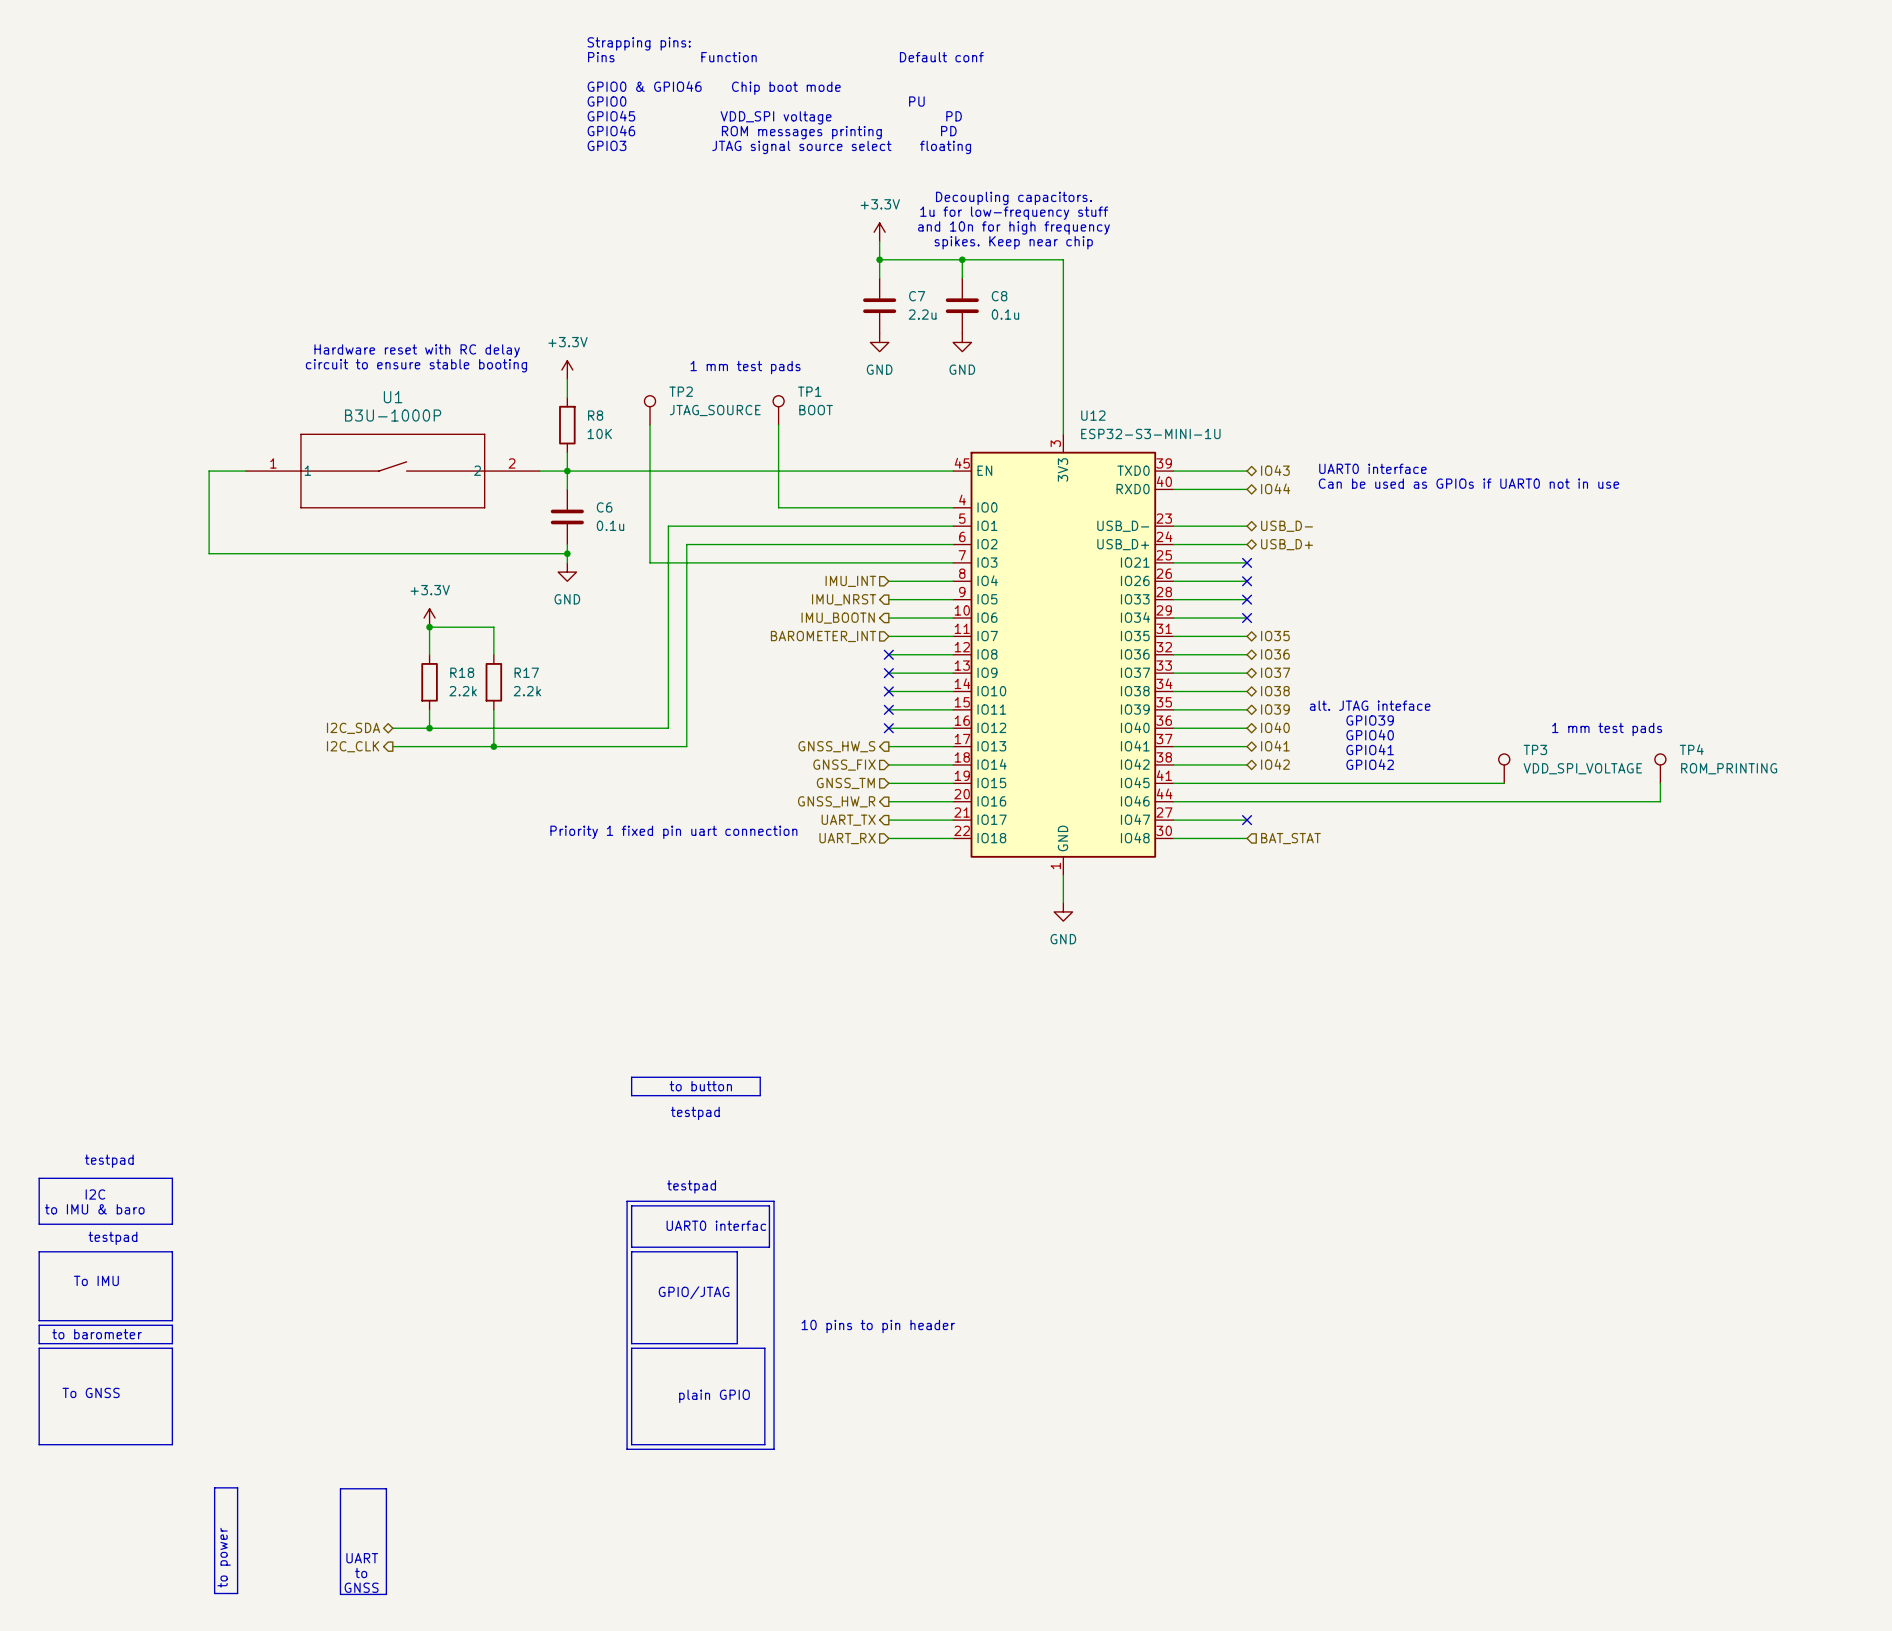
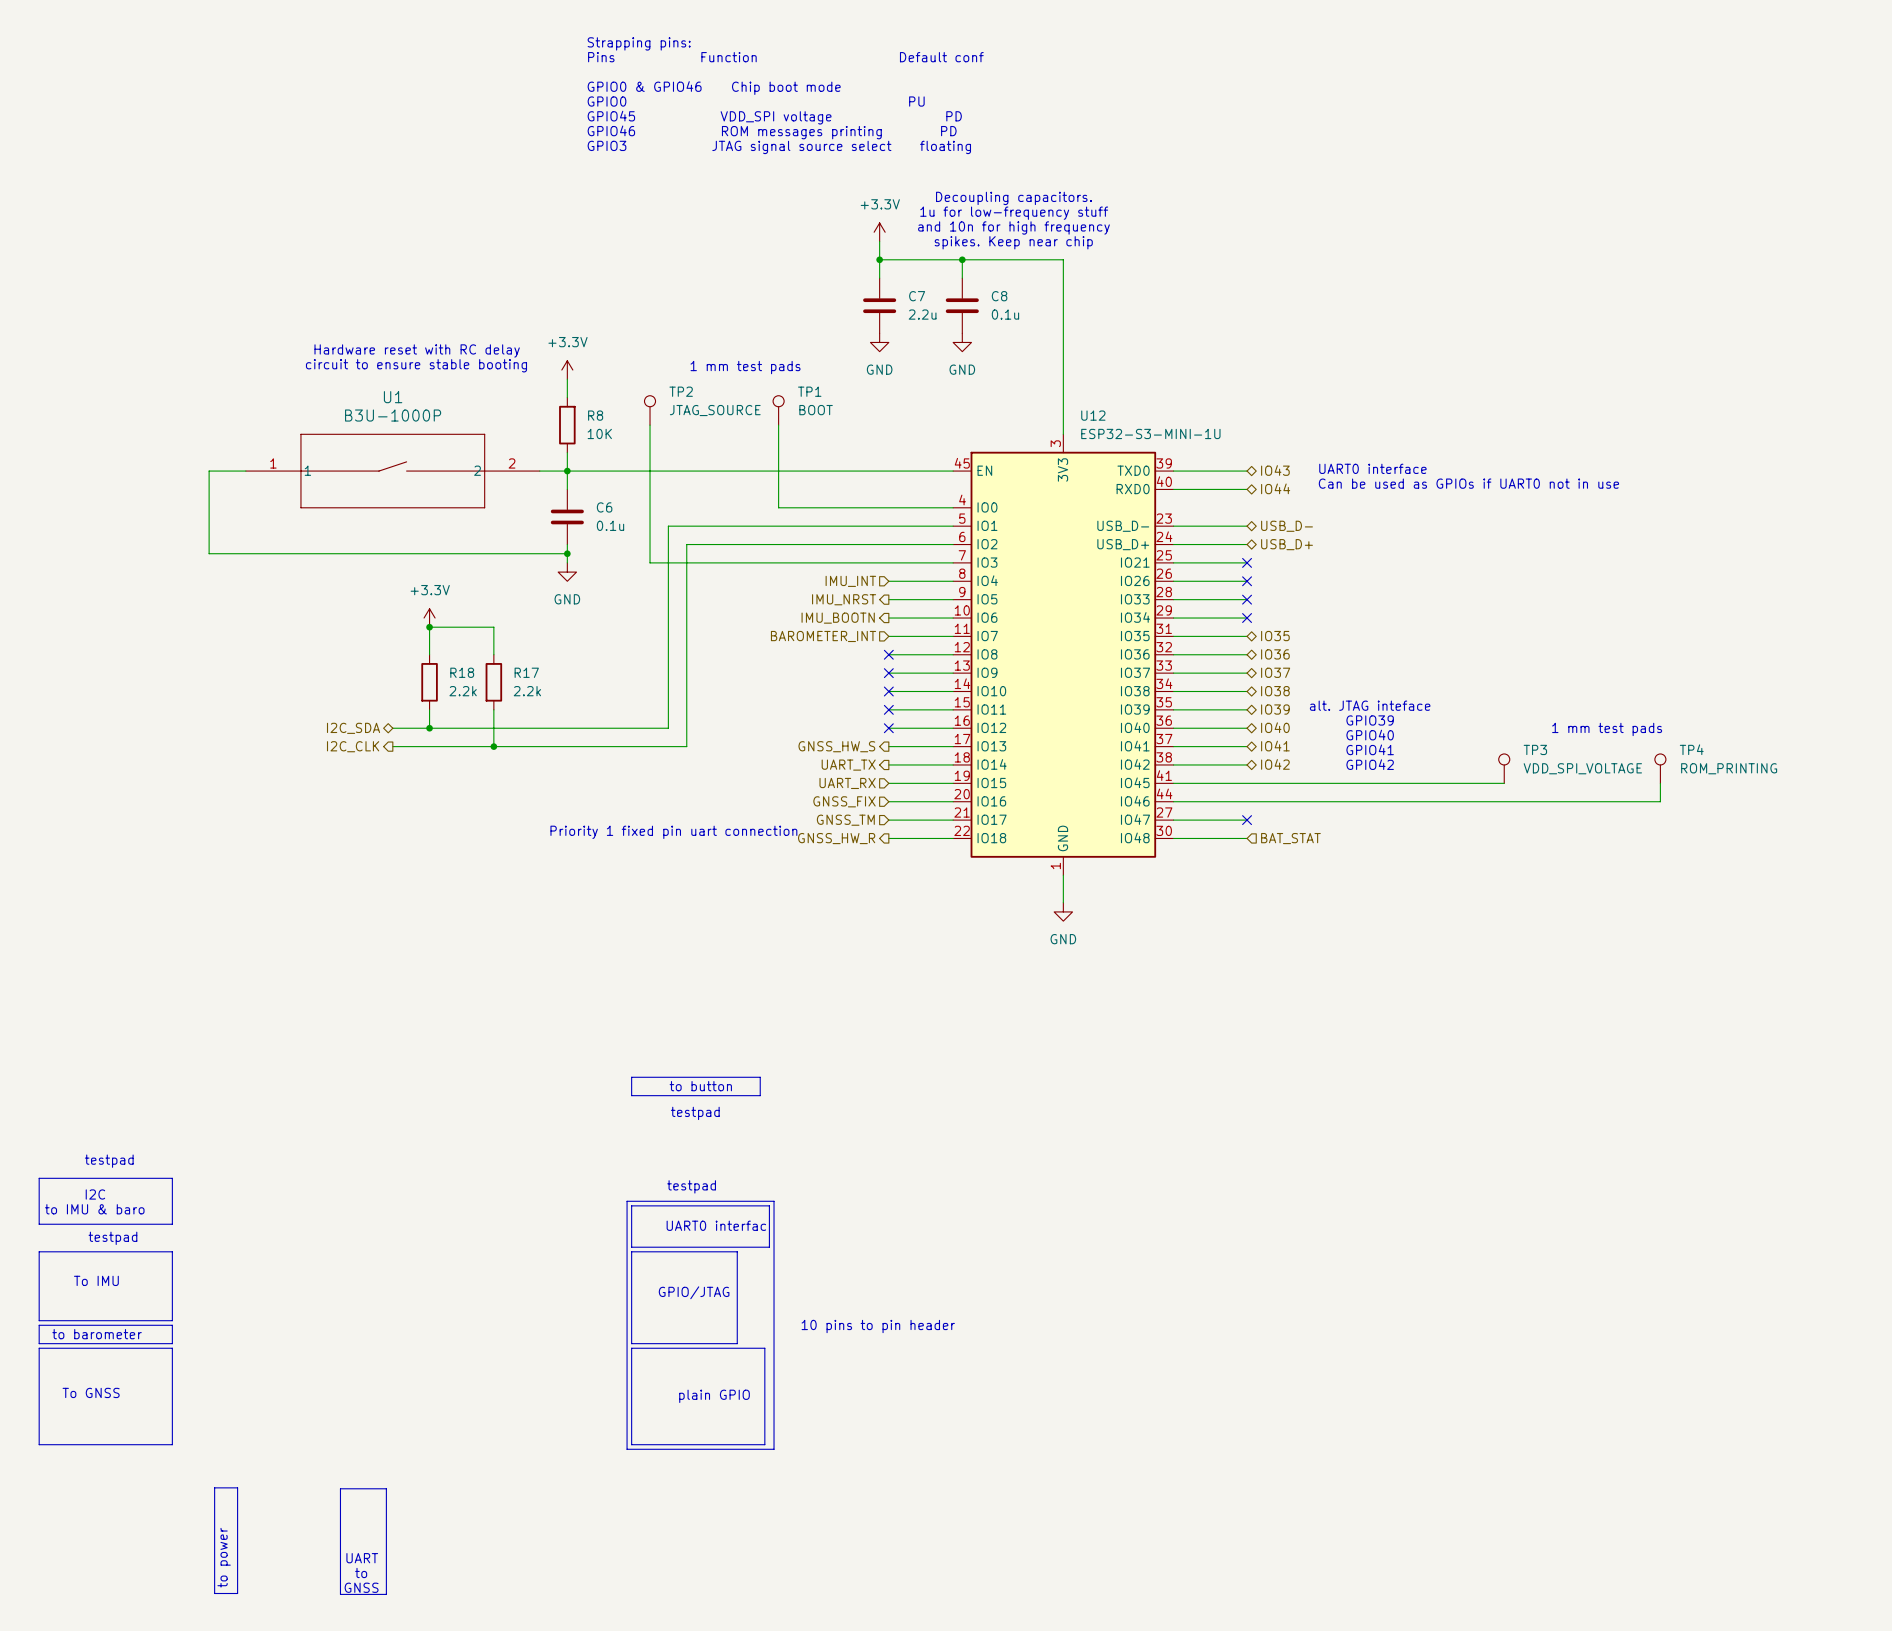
hierarchical label shape: input (844, 765) -> output (848, 765)
hierarchical label: GNSS_FIX (844, 765) -> UART_TX (848, 765)
hierarchical label: GNSS_TM (845, 783) -> UART_RX (847, 783)
hierarchical label shape: output (836, 801) -> input (844, 801)
hierarchical label: GNSS_HW_R (836, 801) -> GNSS_FIX (844, 801)
hierarchical label shape: output (848, 820) -> input (845, 820)
hierarchical label: UART_TX (848, 820) -> GNSS_TM (845, 820)
hierarchical label shape: input (847, 838) -> output (836, 838)
hierarchical label: UART_RX (847, 838) -> GNSS_HW_R (836, 838)

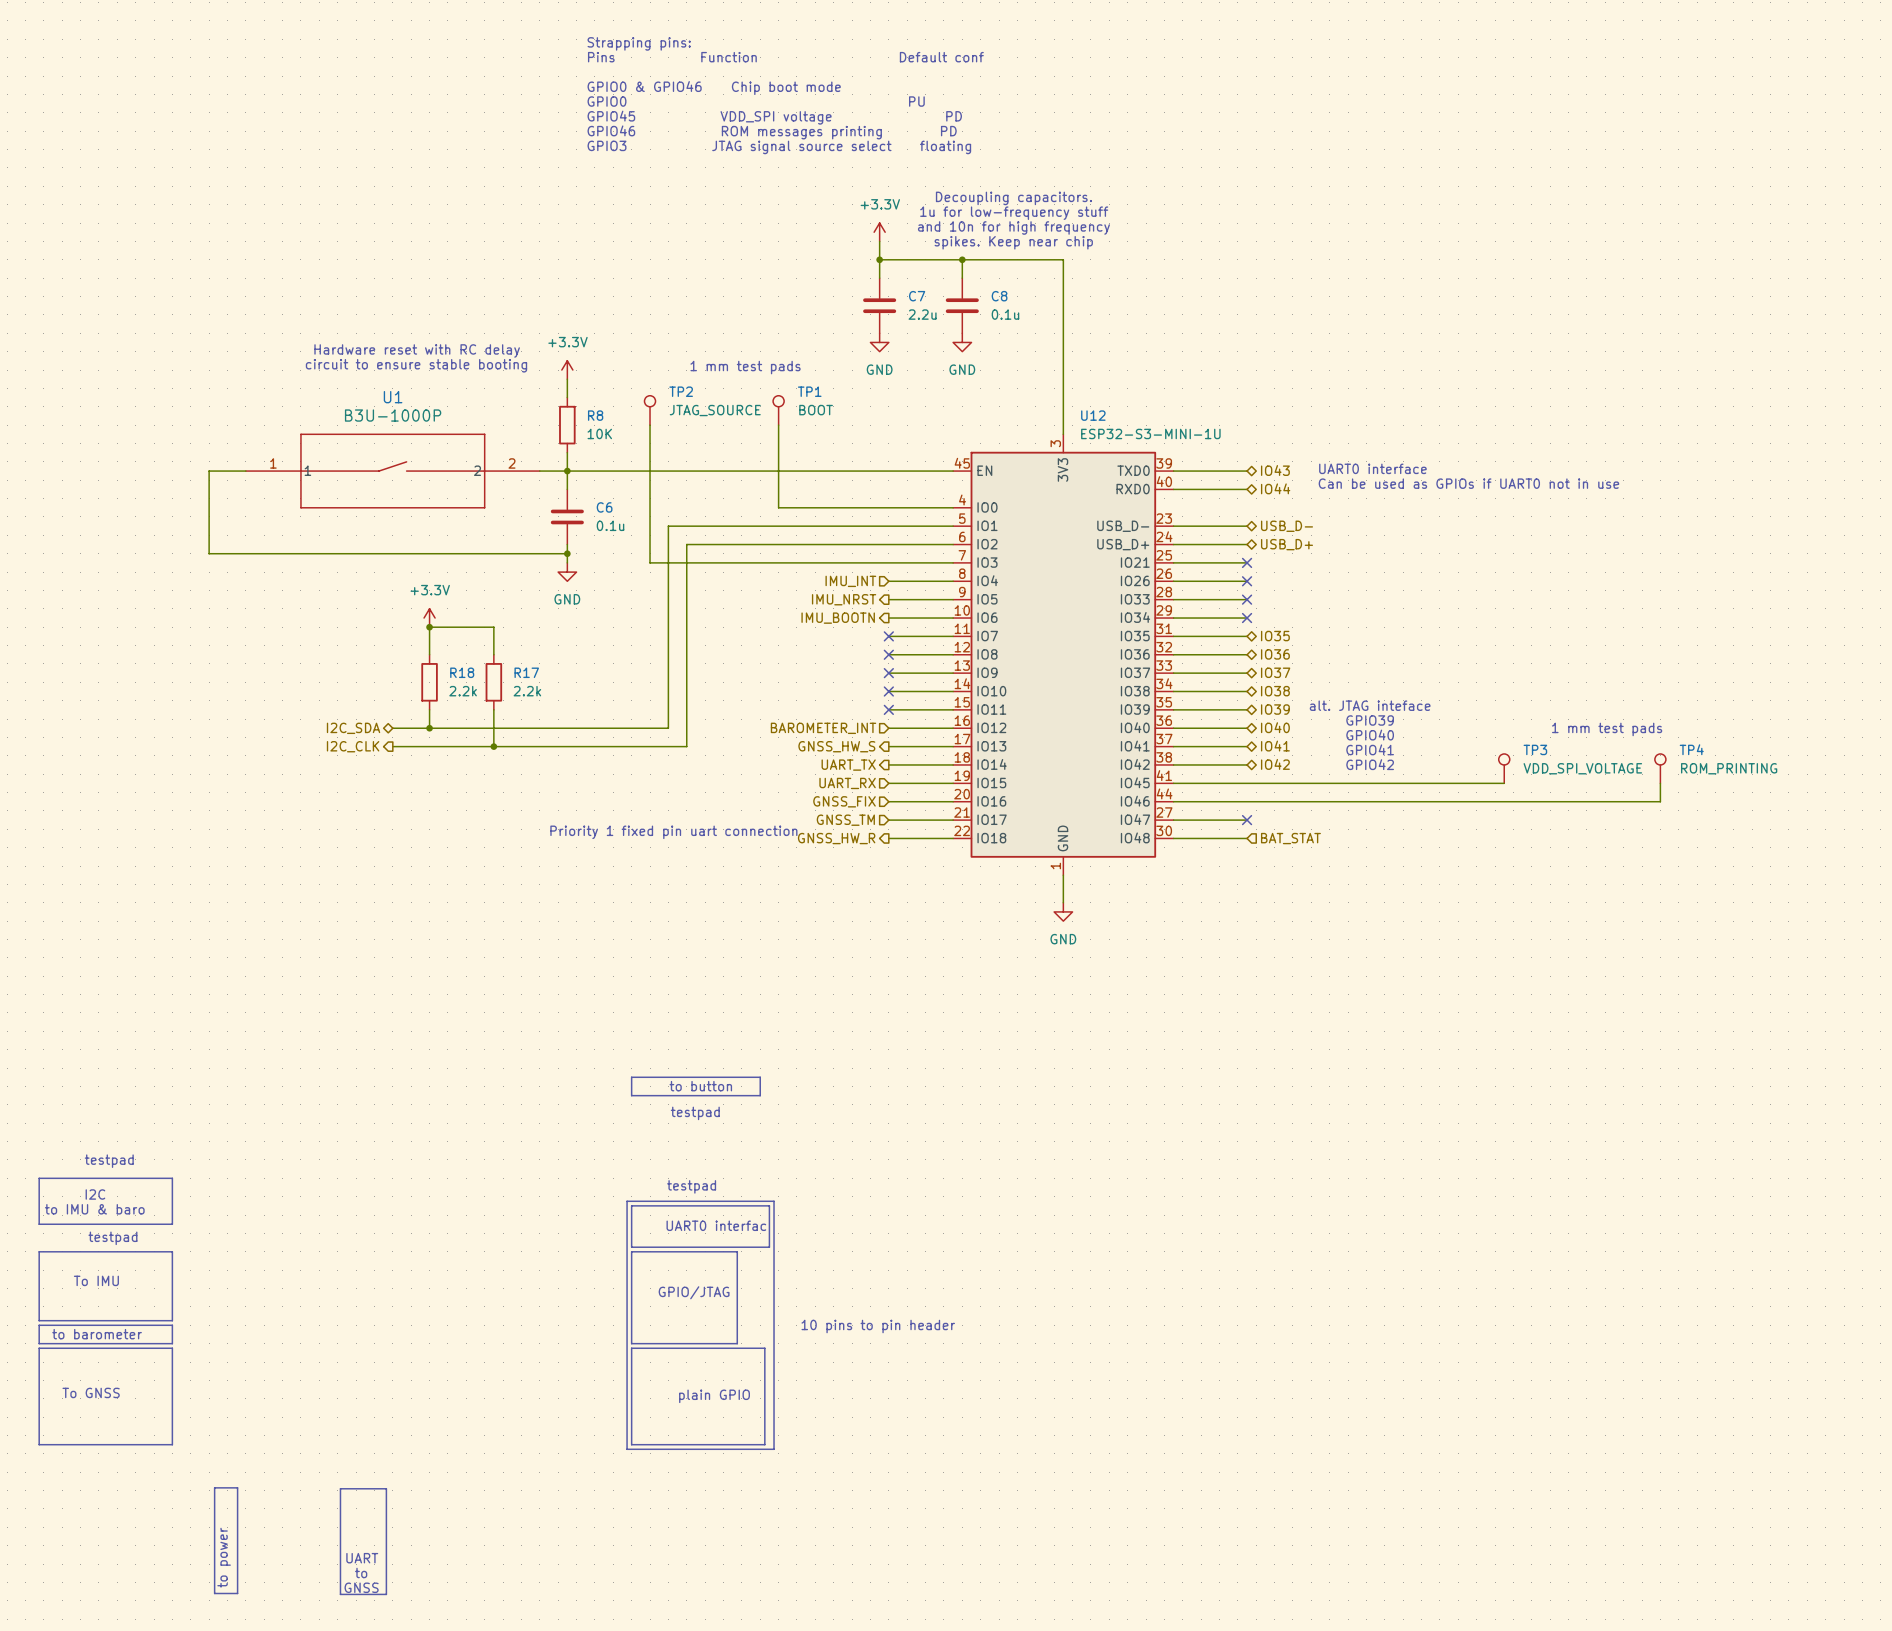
hierarchical label position: BAROMETER_INT (823, 636) -> BAROMETER_INT (823, 728)
no-connect mark: none -> (888, 636)
no-connect mark: (888, 728) -> none

